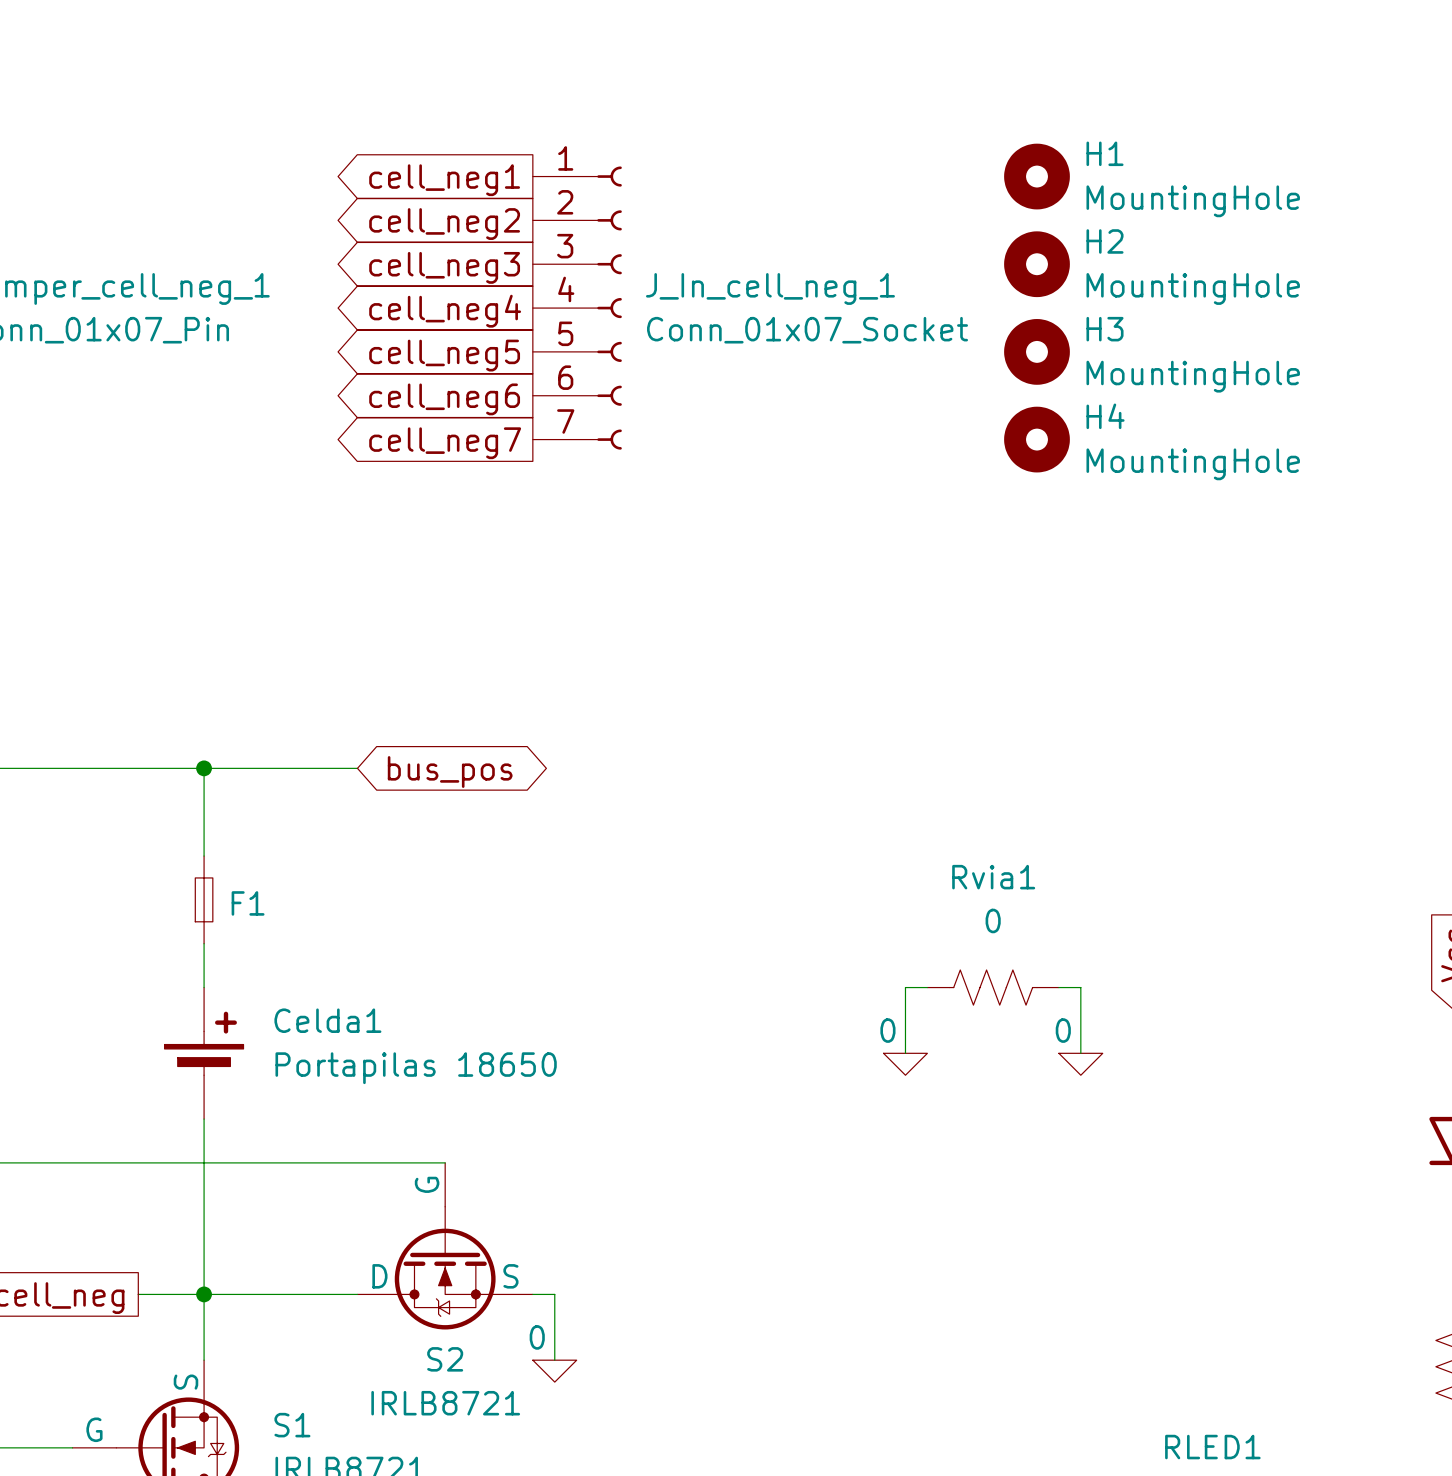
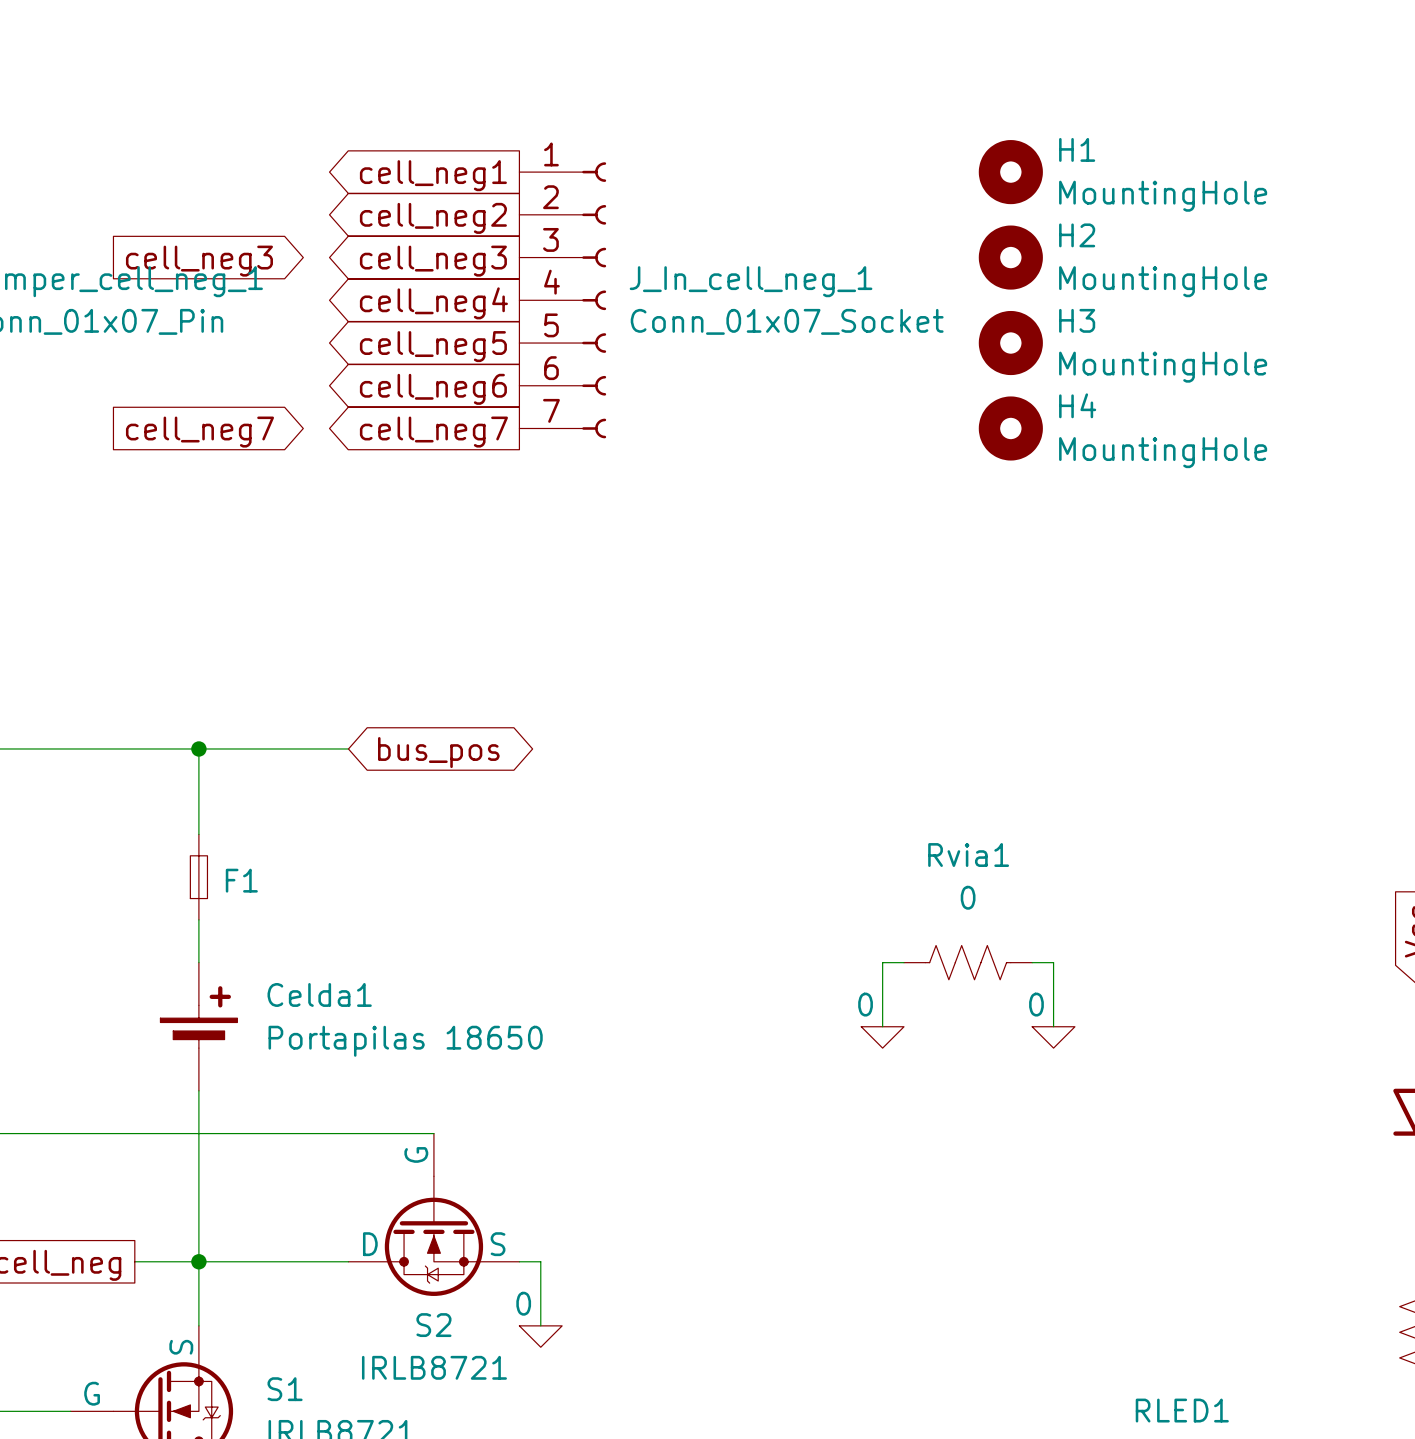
global label: none -> cell_neg3 (199, 261)
global label: none -> cell_neg7 (199, 432)

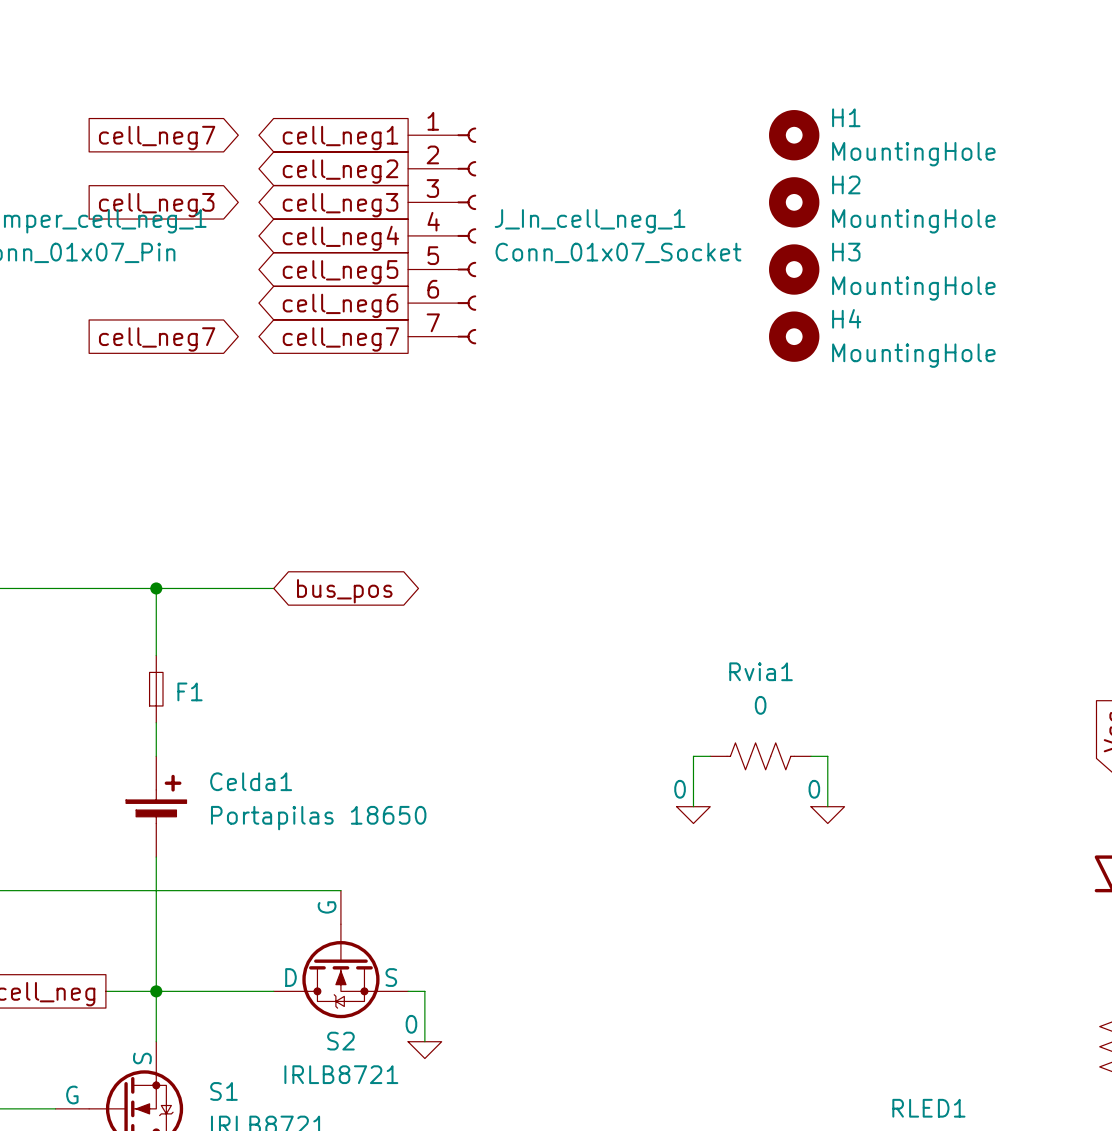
global label: none -> cell_neg7 (157, 138)

